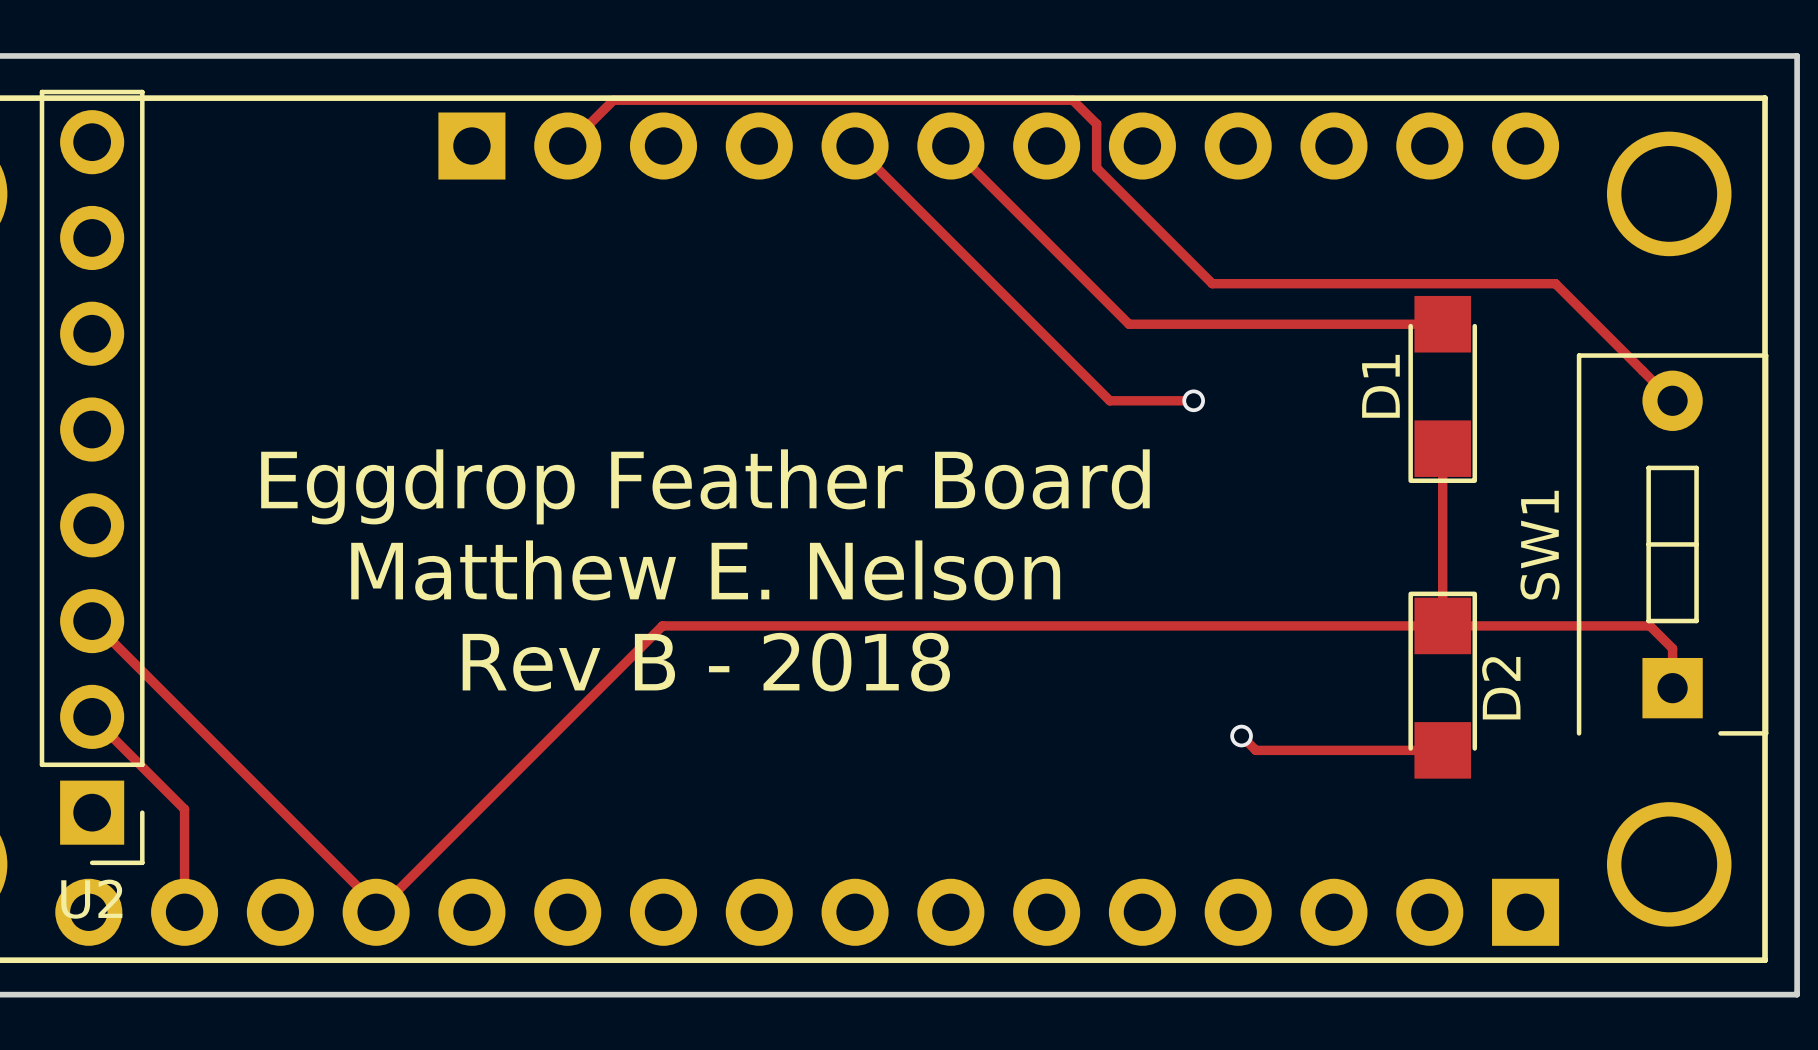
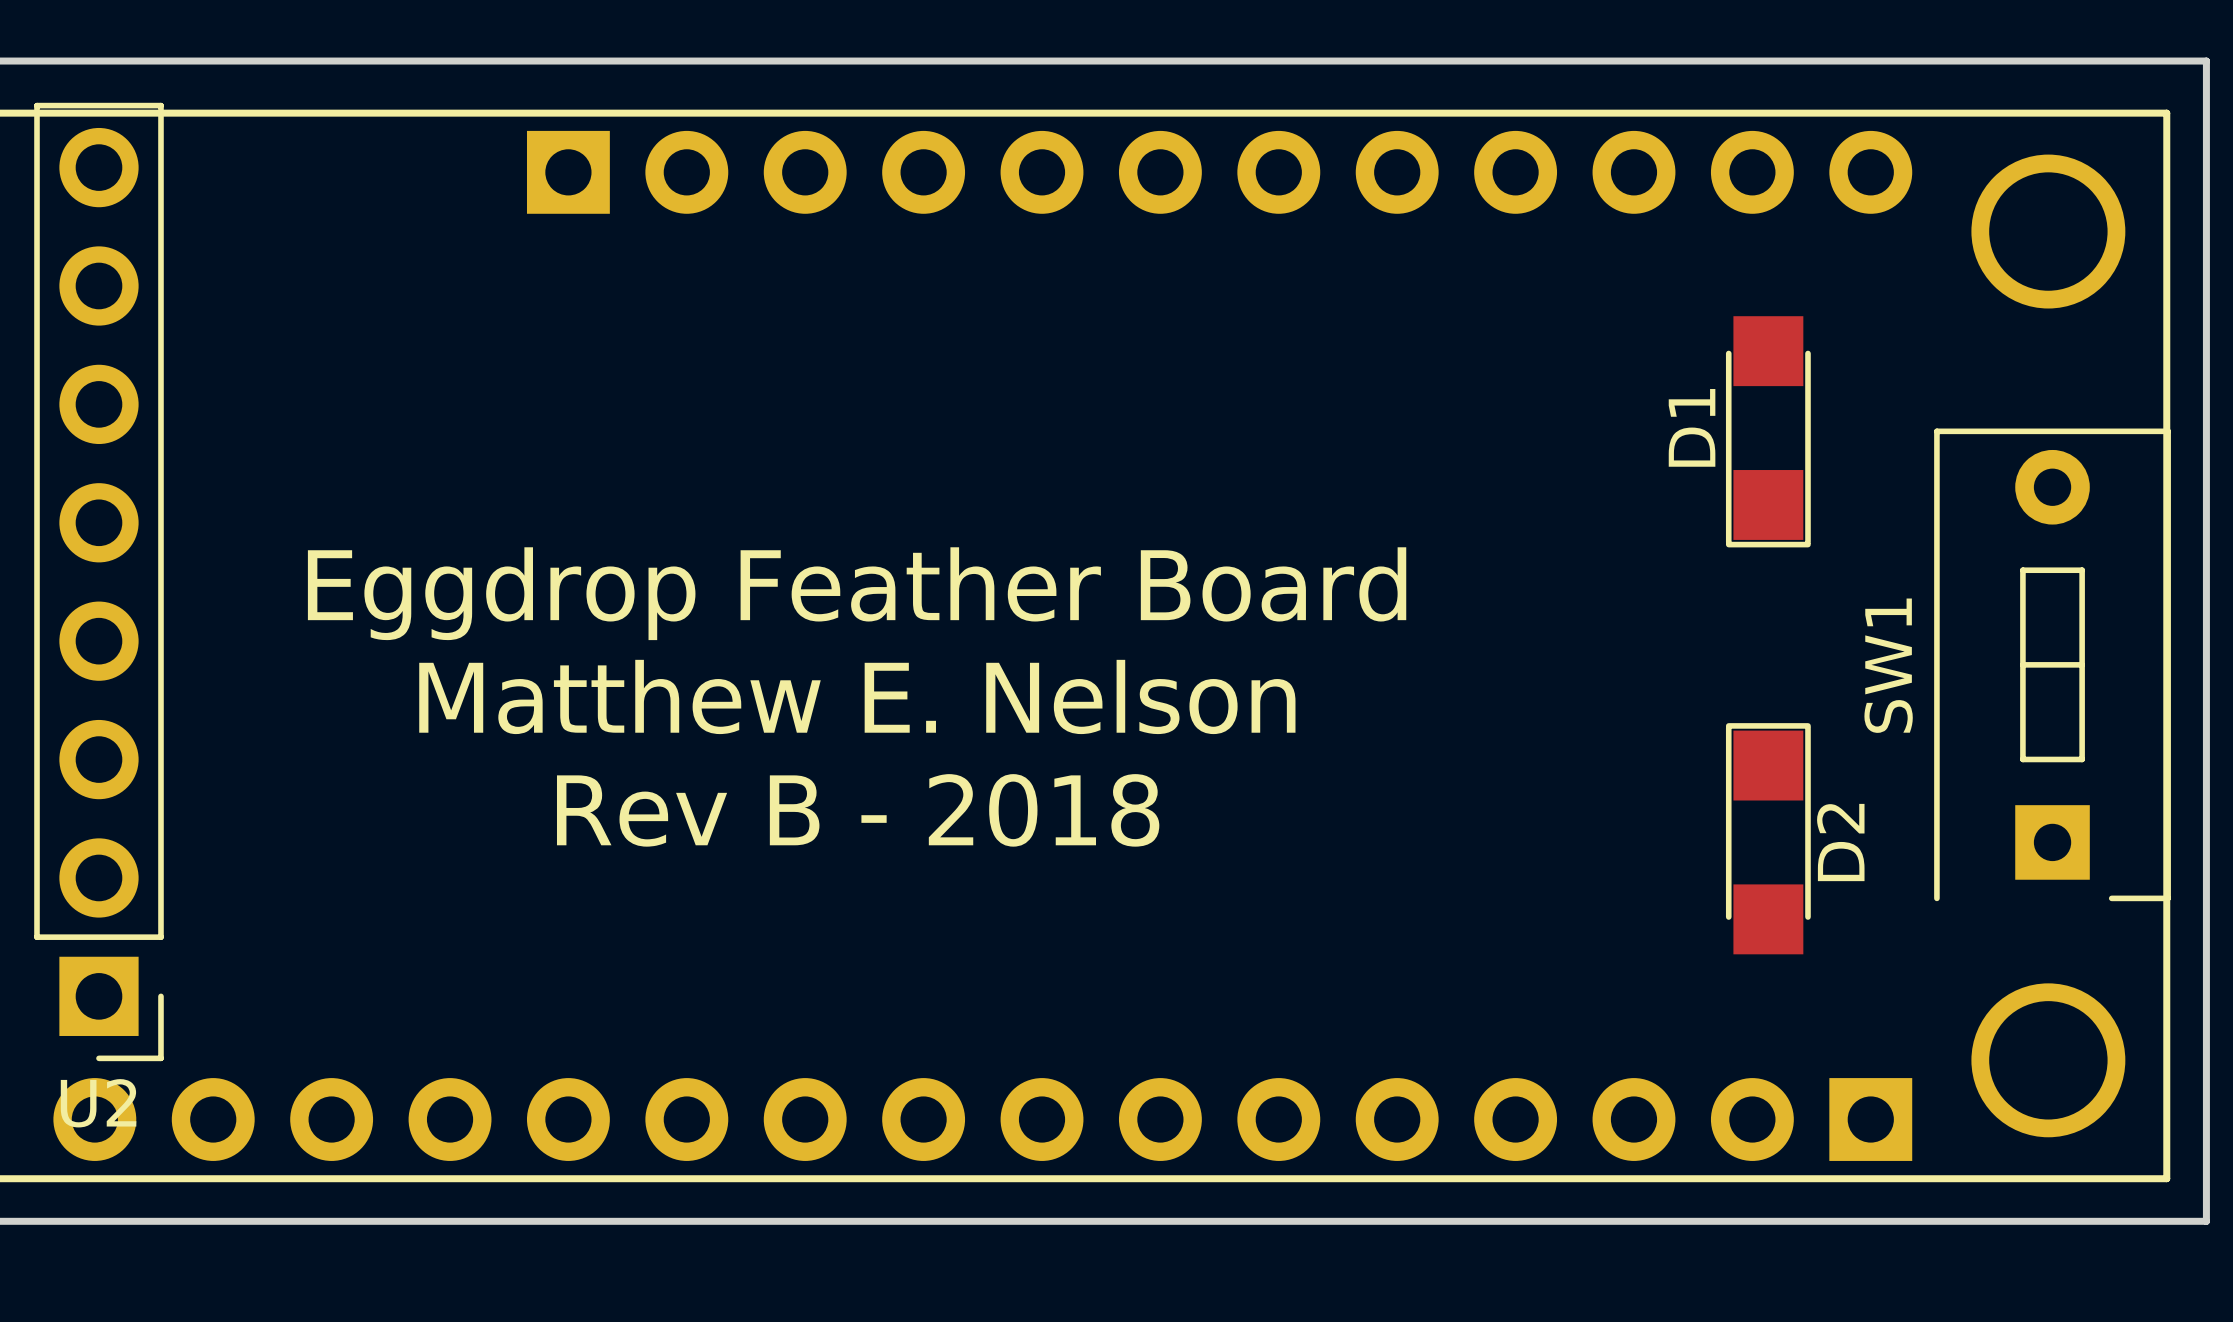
track: (567, 146) (613, 100) (1072, 100) (1096, 124) (1096, 167) (1212, 283) (1555, 283) (1672, 400) -> none
track: (855, 146) (1109, 400) (1193, 400) -> none
track: (950, 146) (1129, 324) (1442, 324) -> none
D1 position: (1442, 389) -> (1768, 431)
via: (1193, 400) -> none
track: (1442, 448) (1442, 625) -> none
track: (92, 621) (376, 905) (376, 912) (662, 625) (1649, 625) (1672, 648) (1672, 688) -> none
track: (92, 716) (184, 809) (184, 912) -> none
track: (1241, 736) (1255, 750) (1442, 750) -> none
via: (1241, 736) -> none

